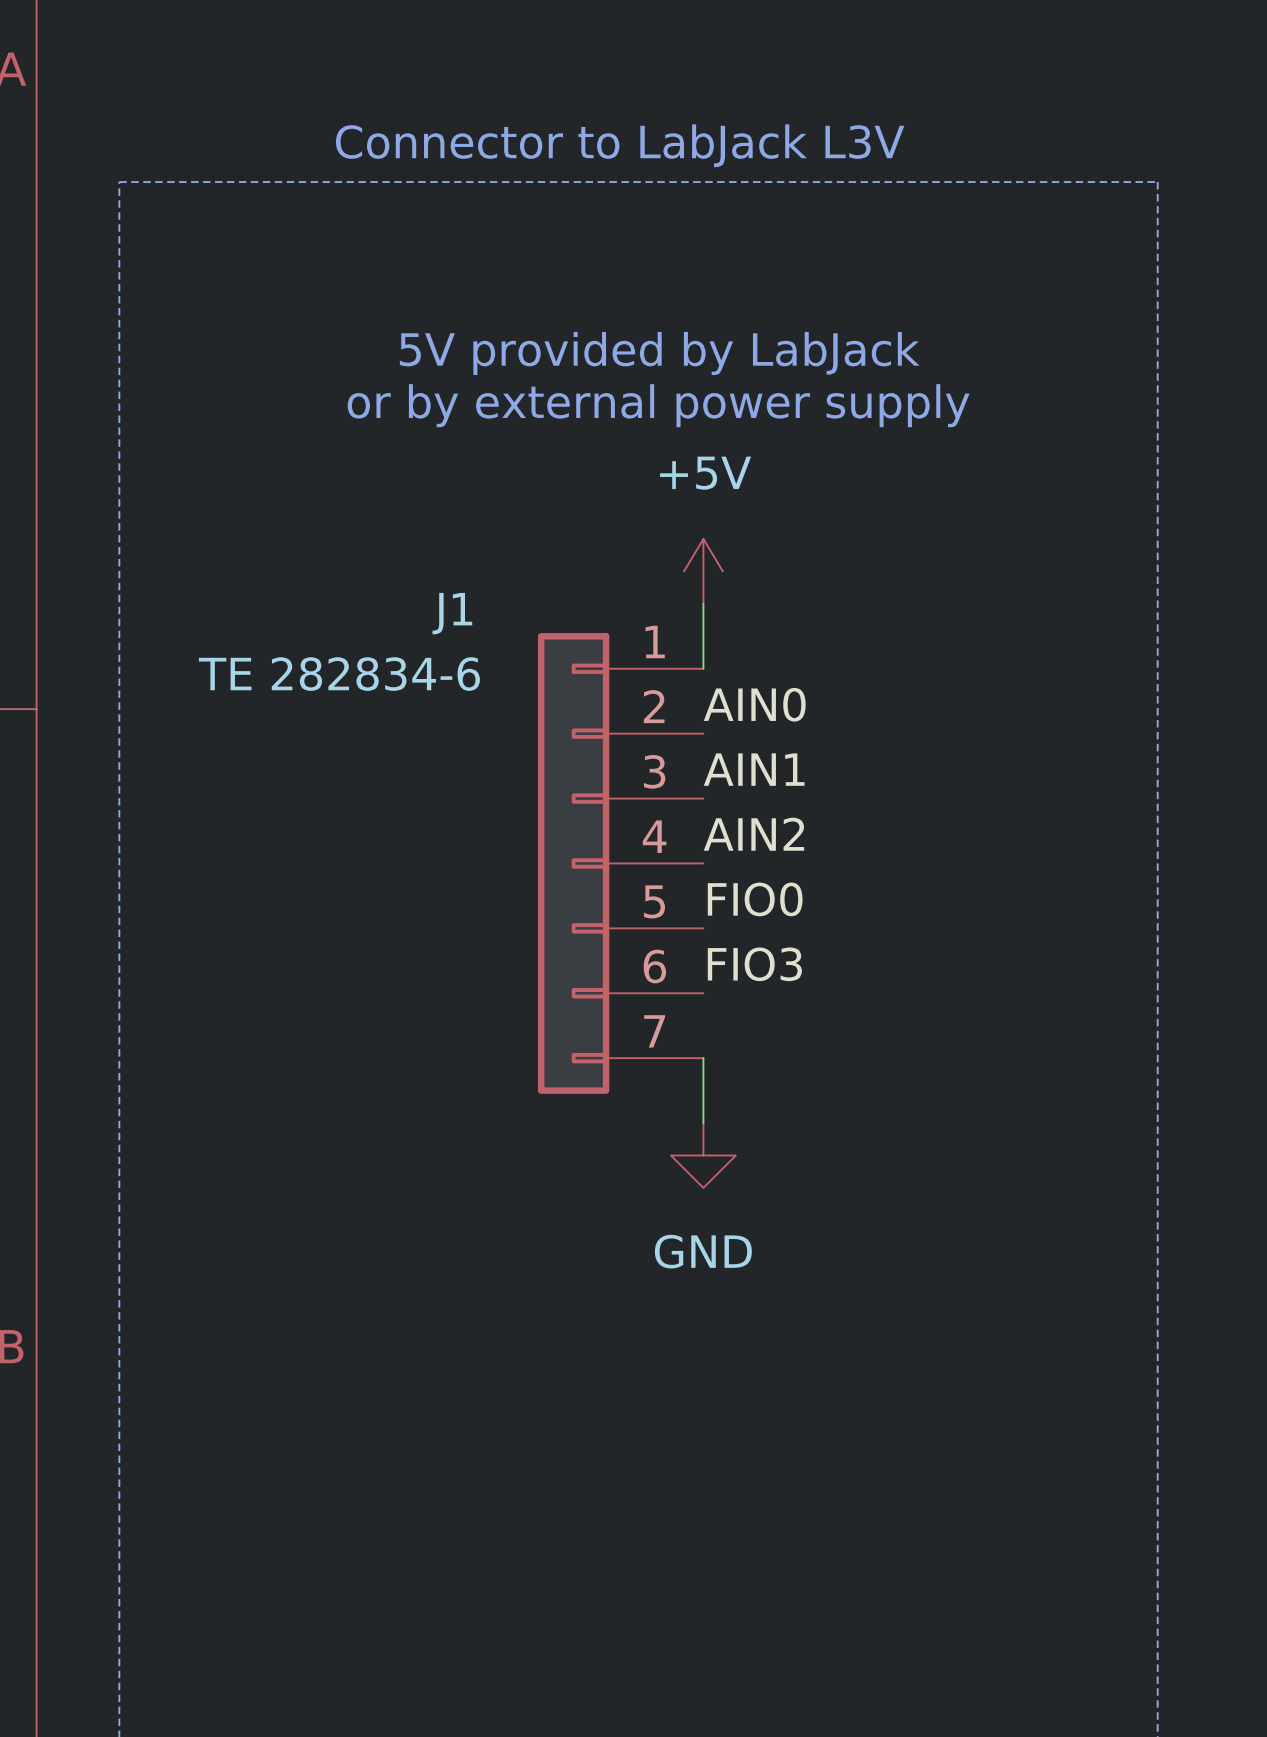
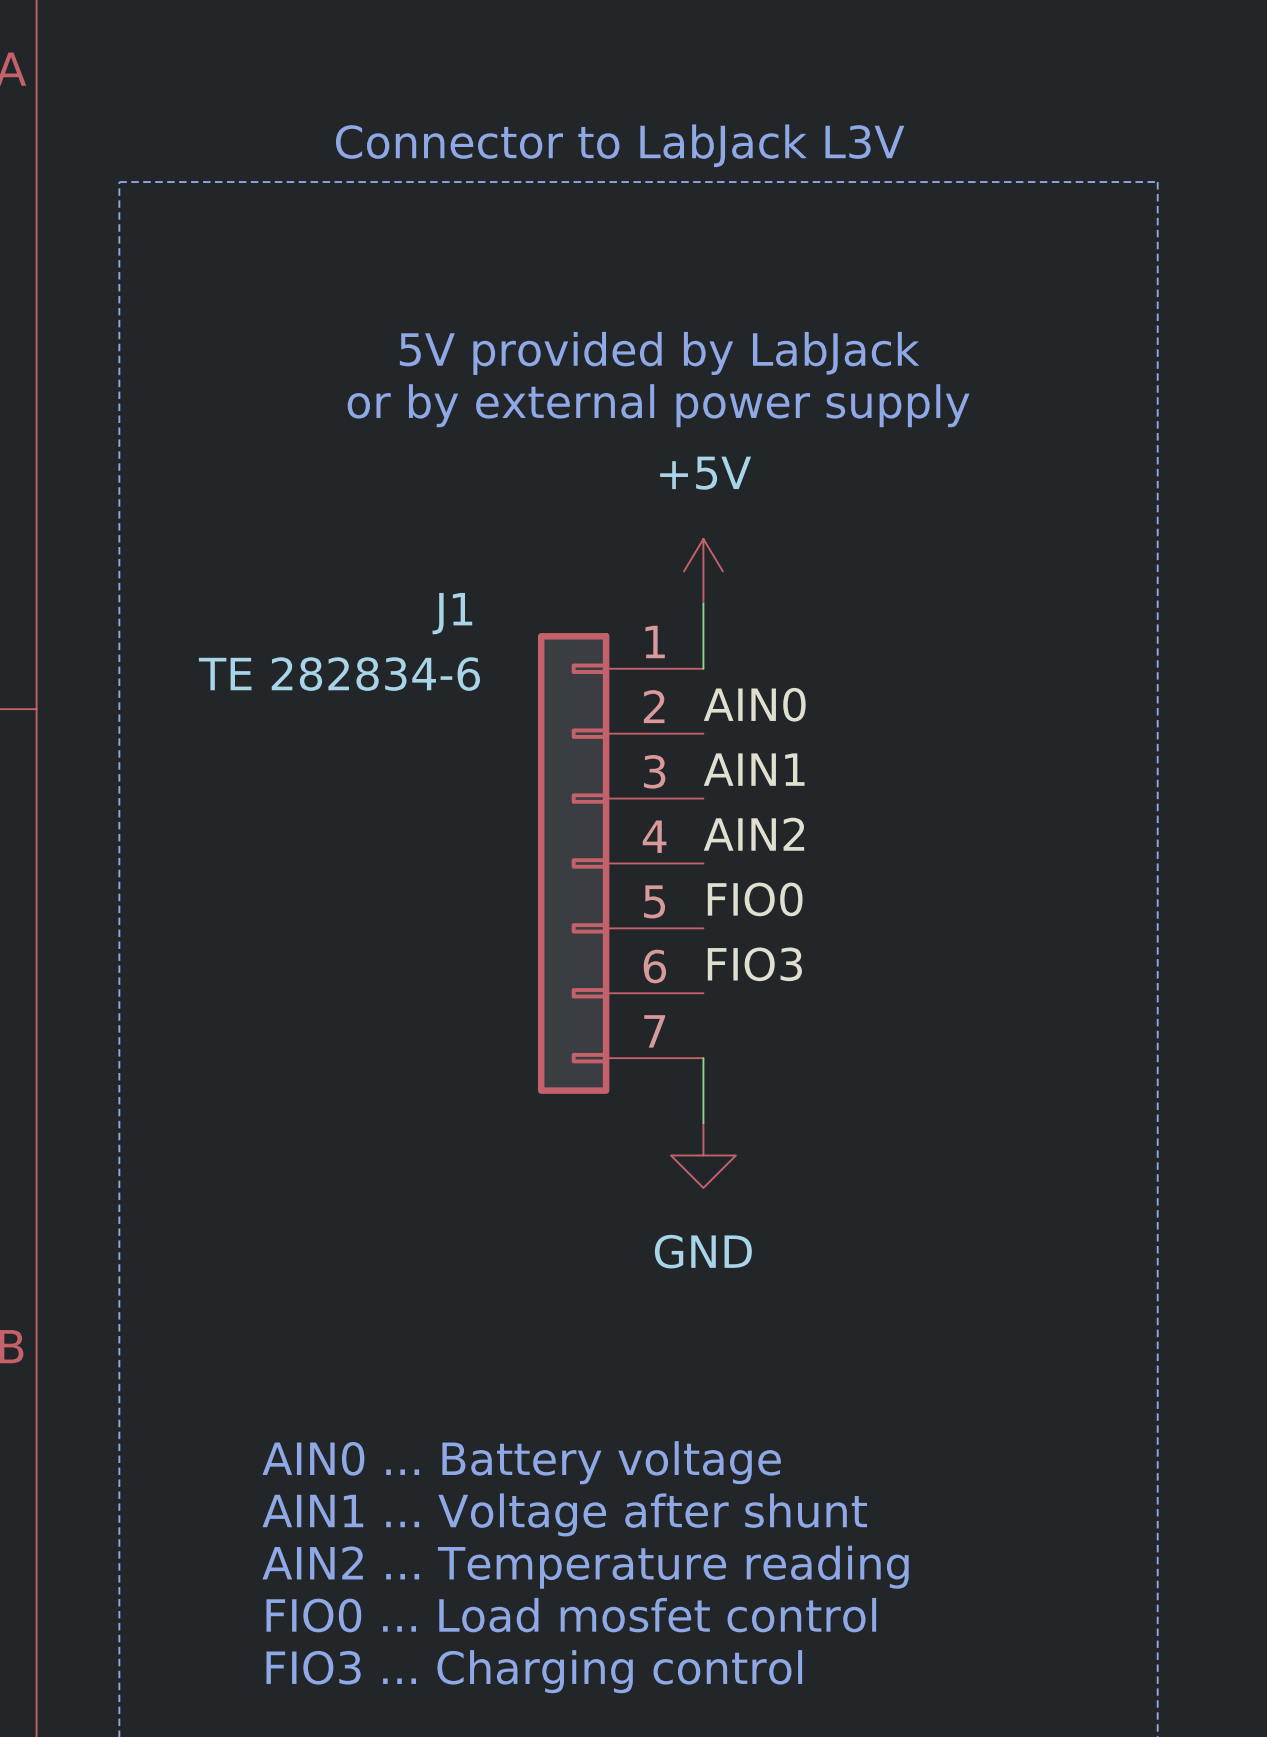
text: none -> AIN0 ... Battery voltage (521, 1462)
text: none -> AIN1 ... Voltage after shunt (564, 1514)
text: none -> AIN2 ... Temperature reading (585, 1567)
text: none -> FIO0 ... Load mosfet control (571, 1615)
text: none -> FIO3 ... Charging control (534, 1671)

